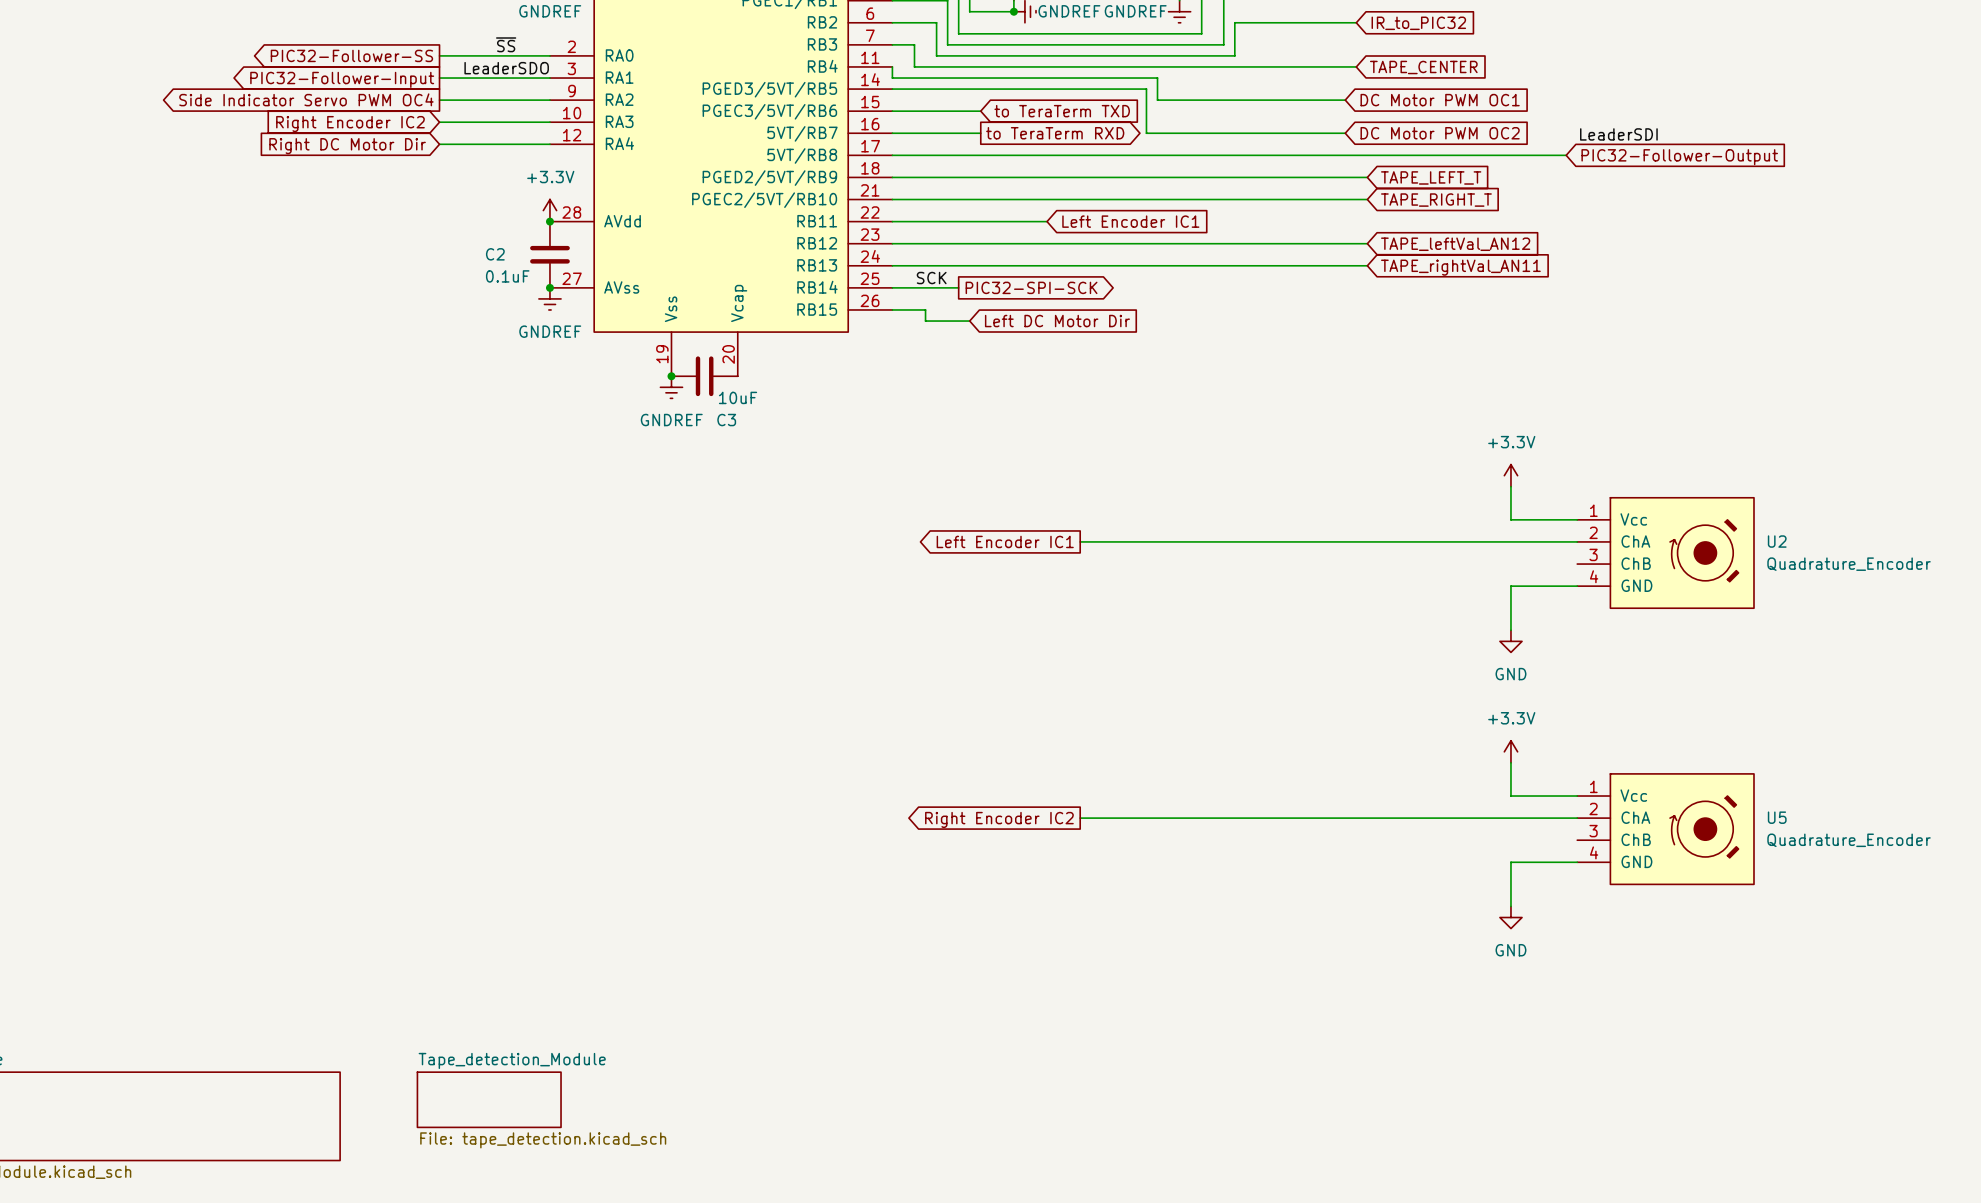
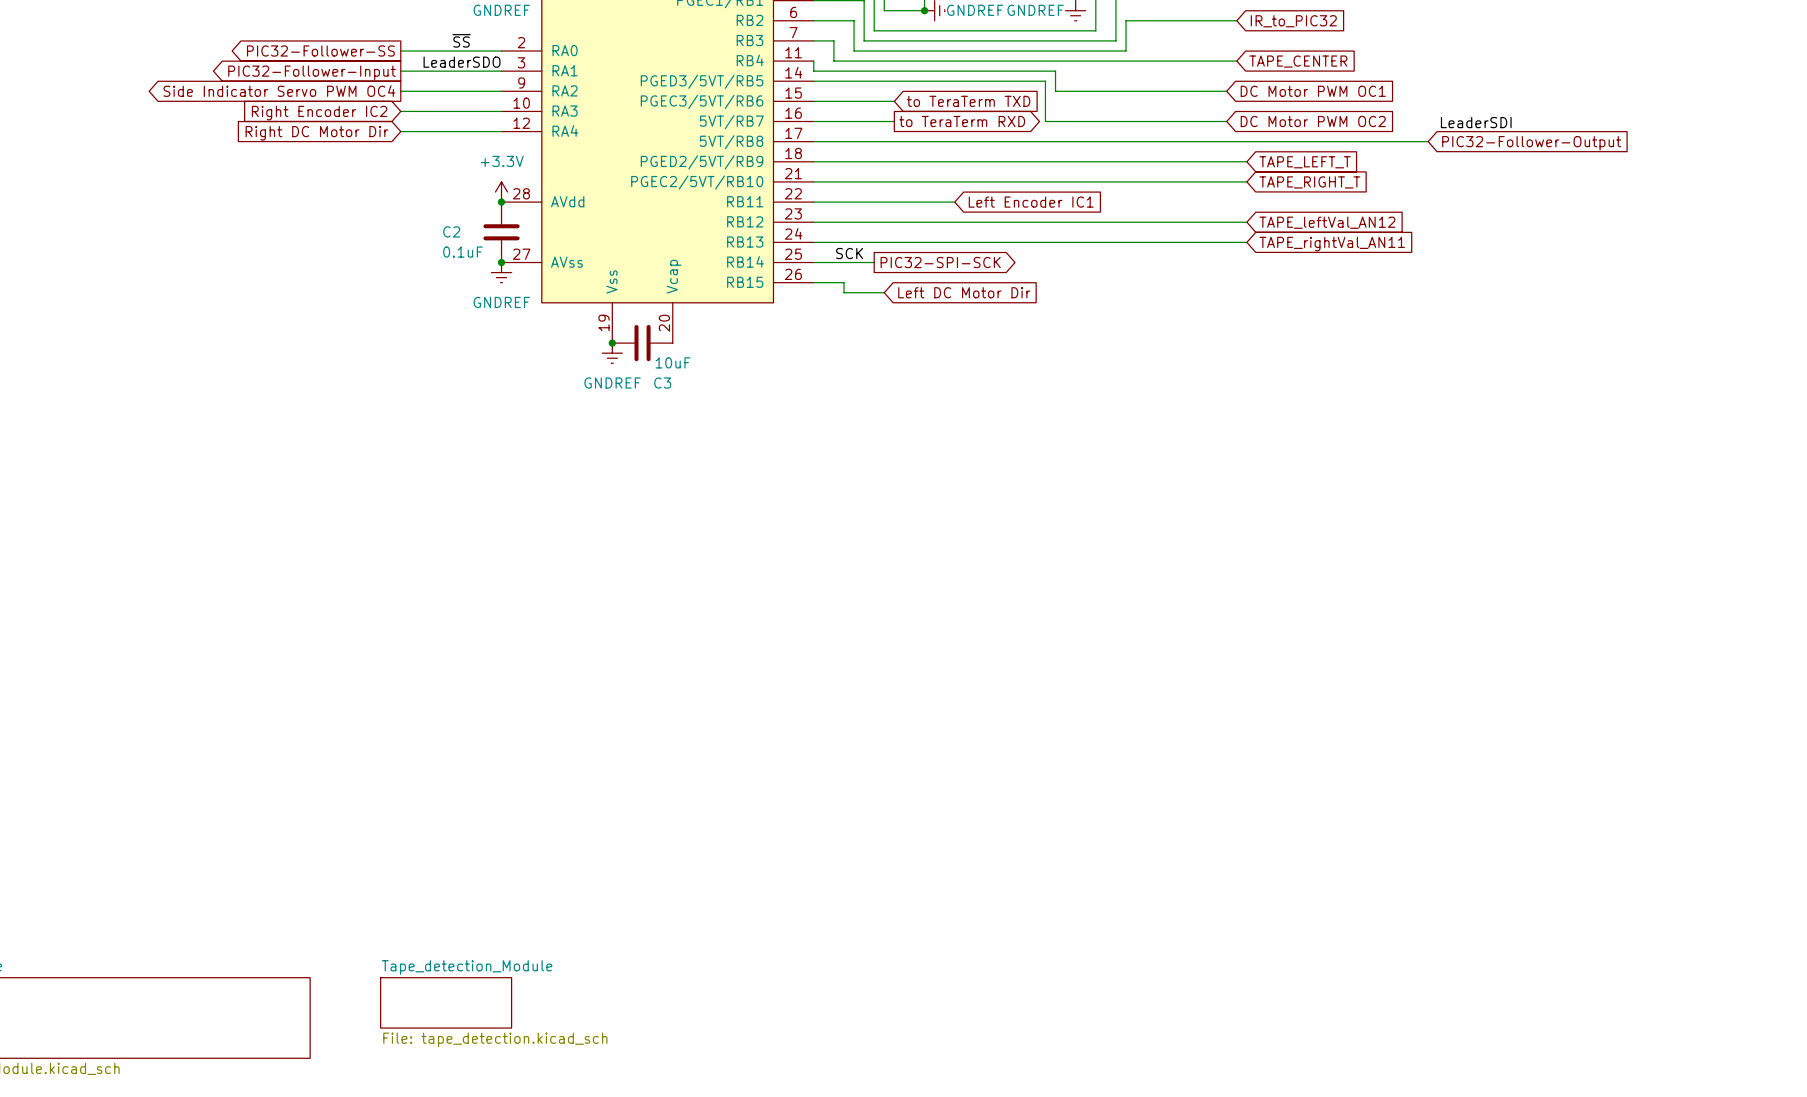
power symbol: +3.3V (1510, 475) -> none
wire: (1510, 486) (1510, 519) (1577, 519) -> none
global label: Left Encoder IC1 (1005, 541) -> none
wire: (1080, 541) (1577, 541) -> none
U2: Quadrature_Encoder (1665, 552) -> none
wire: (1577, 586) (1510, 586) (1510, 630) -> none
power symbol: GND (1510, 641) -> none
power symbol: +3.3V (1510, 751) -> none
wire: (1510, 762) (1510, 796) (1577, 796) -> none
wire: (1080, 818) (1577, 818) -> none
global label: Right Encoder IC2 (999, 819) -> none
U5: Quadrature_Encoder (1665, 829) -> none
wire: (1577, 862) (1510, 862) (1510, 906) -> none
power symbol: GND (1510, 917) -> none

